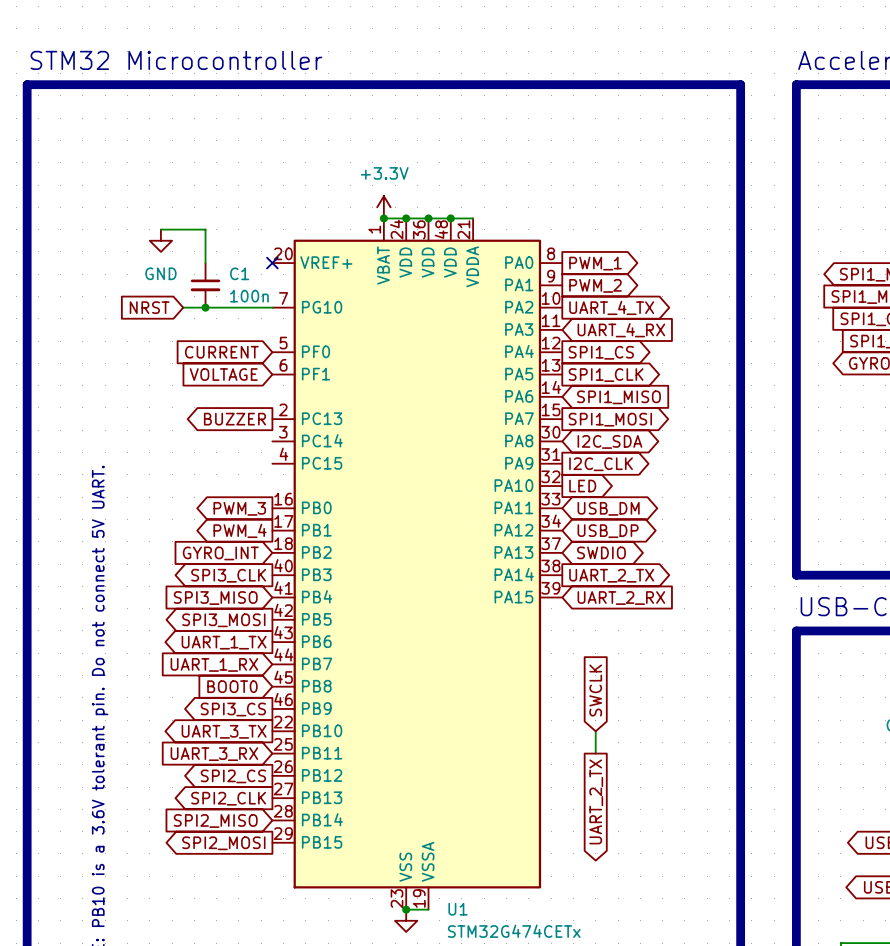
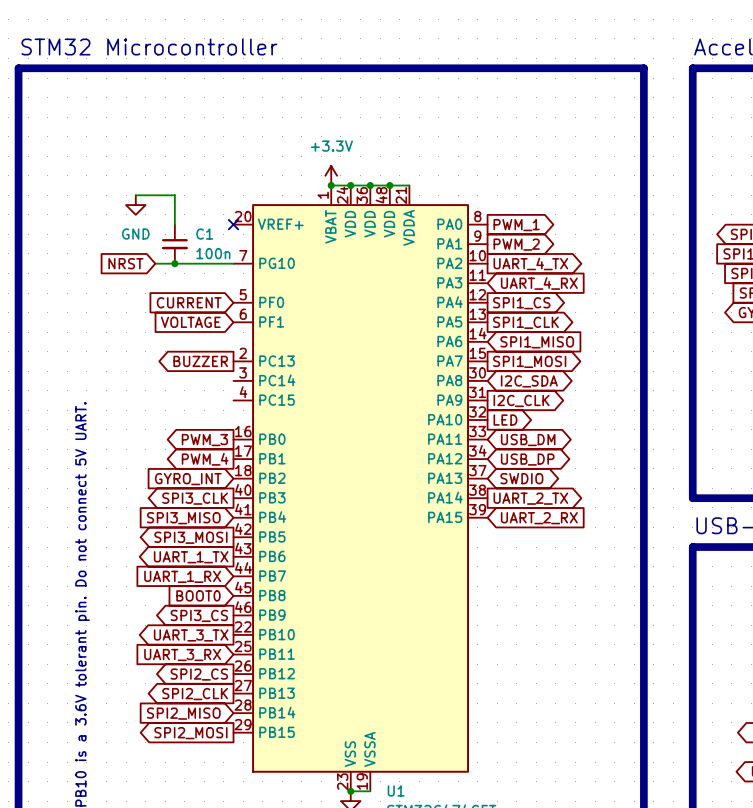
global label: SWCLK (595, 690) -> none
wire: (595, 731) (595, 753) -> none
global label: UART_2_TX (596, 801) -> none

